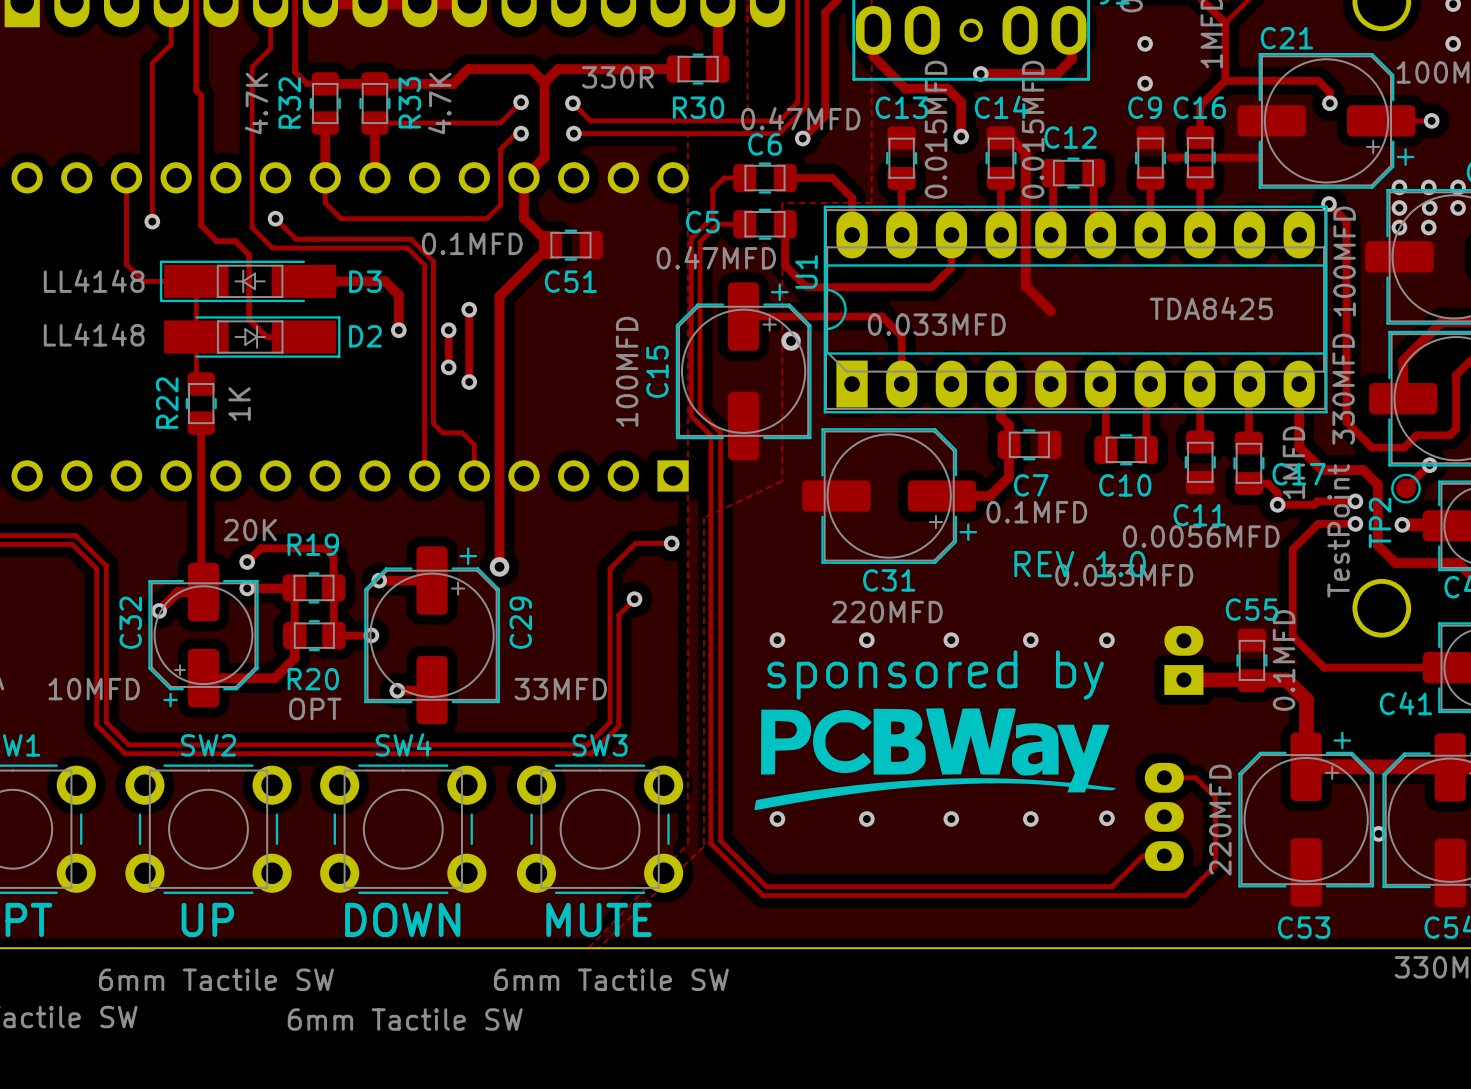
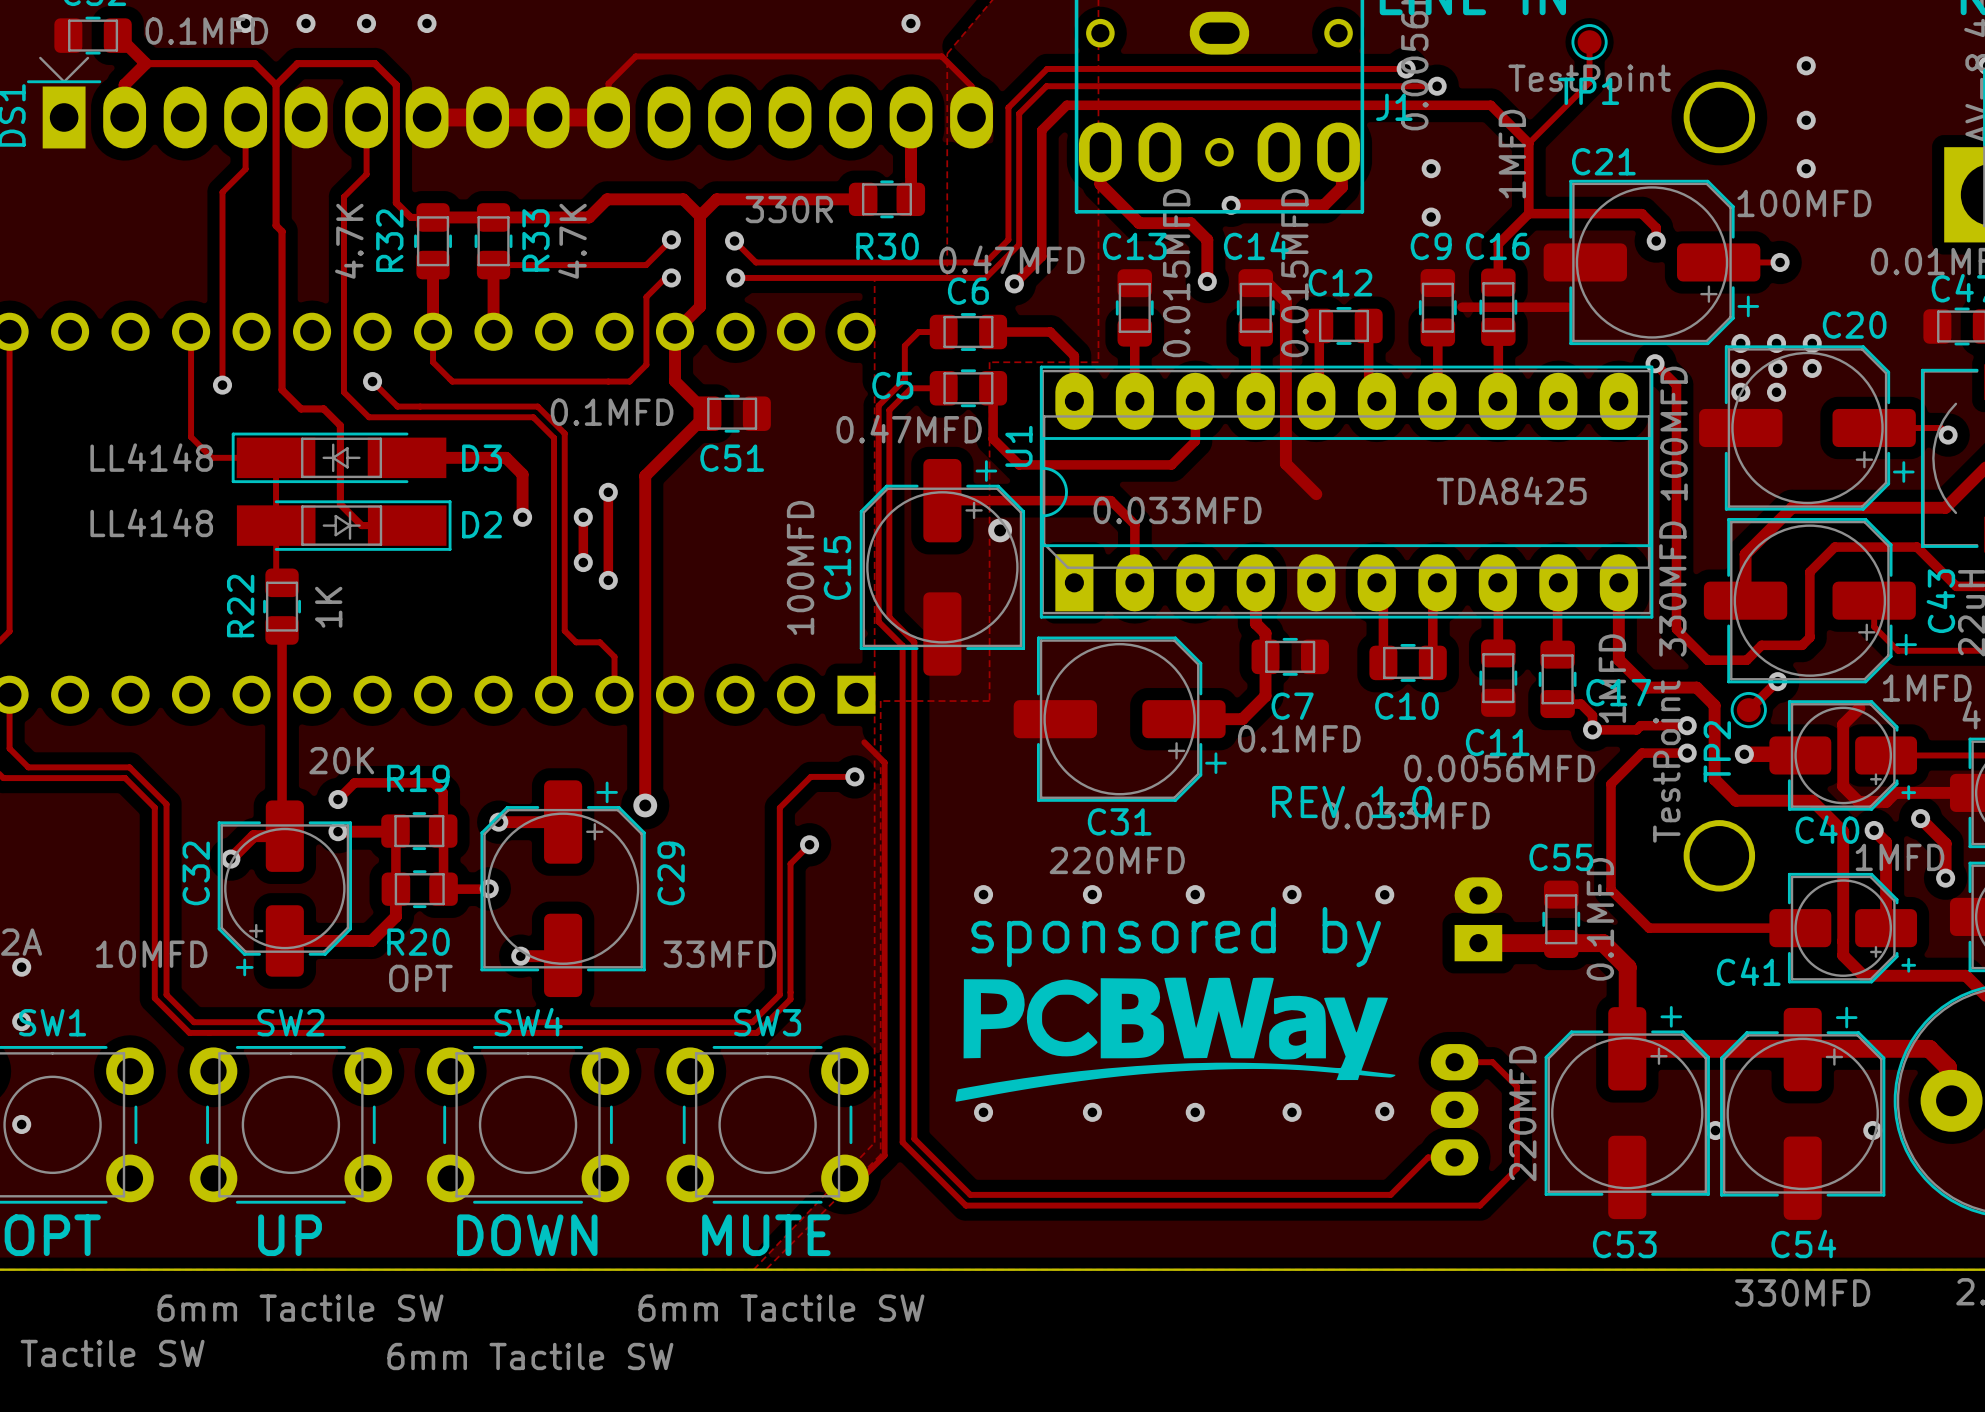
zone outline: (782, 481) (703, 518) (703, 846) (598, 948) -> (989, 701) (880, 701) (880, 1154) (765, 1269)
track: none -> (864, 742) (884, 762) (884, 1155) (861, 1178)

